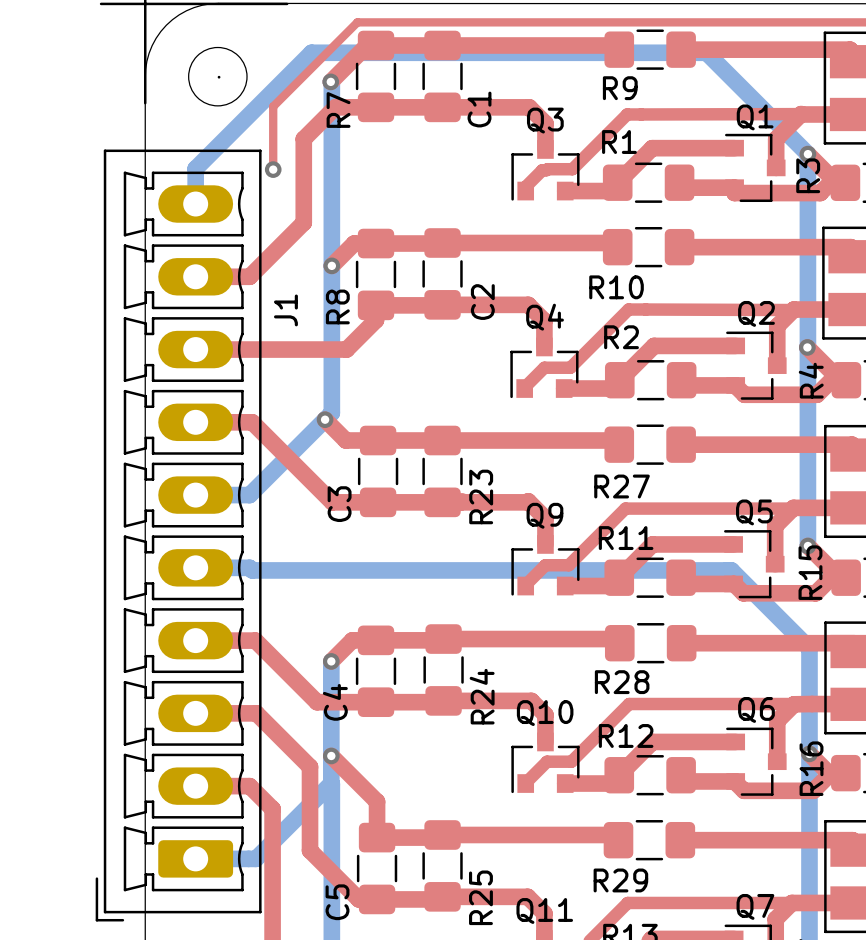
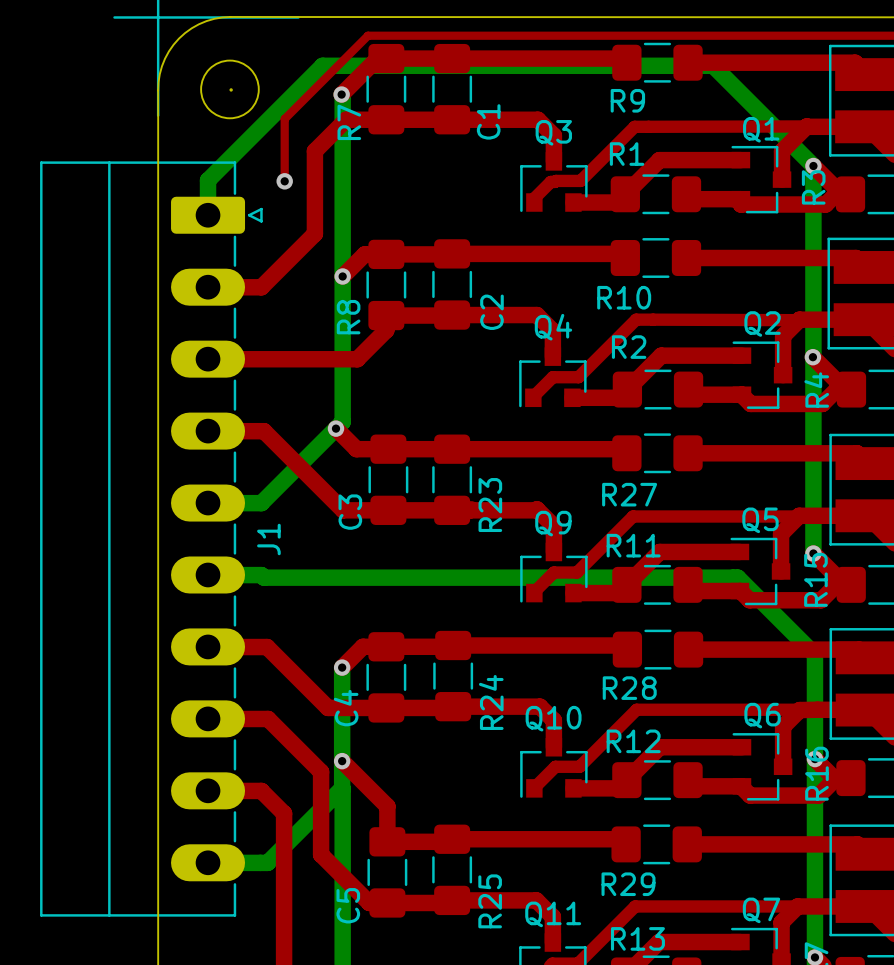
J1 footprint: [95, 149, 262, 922] -> [40, 161, 263, 917]
J1 name position: J1 (285, 310) -> J1 (268, 539)

